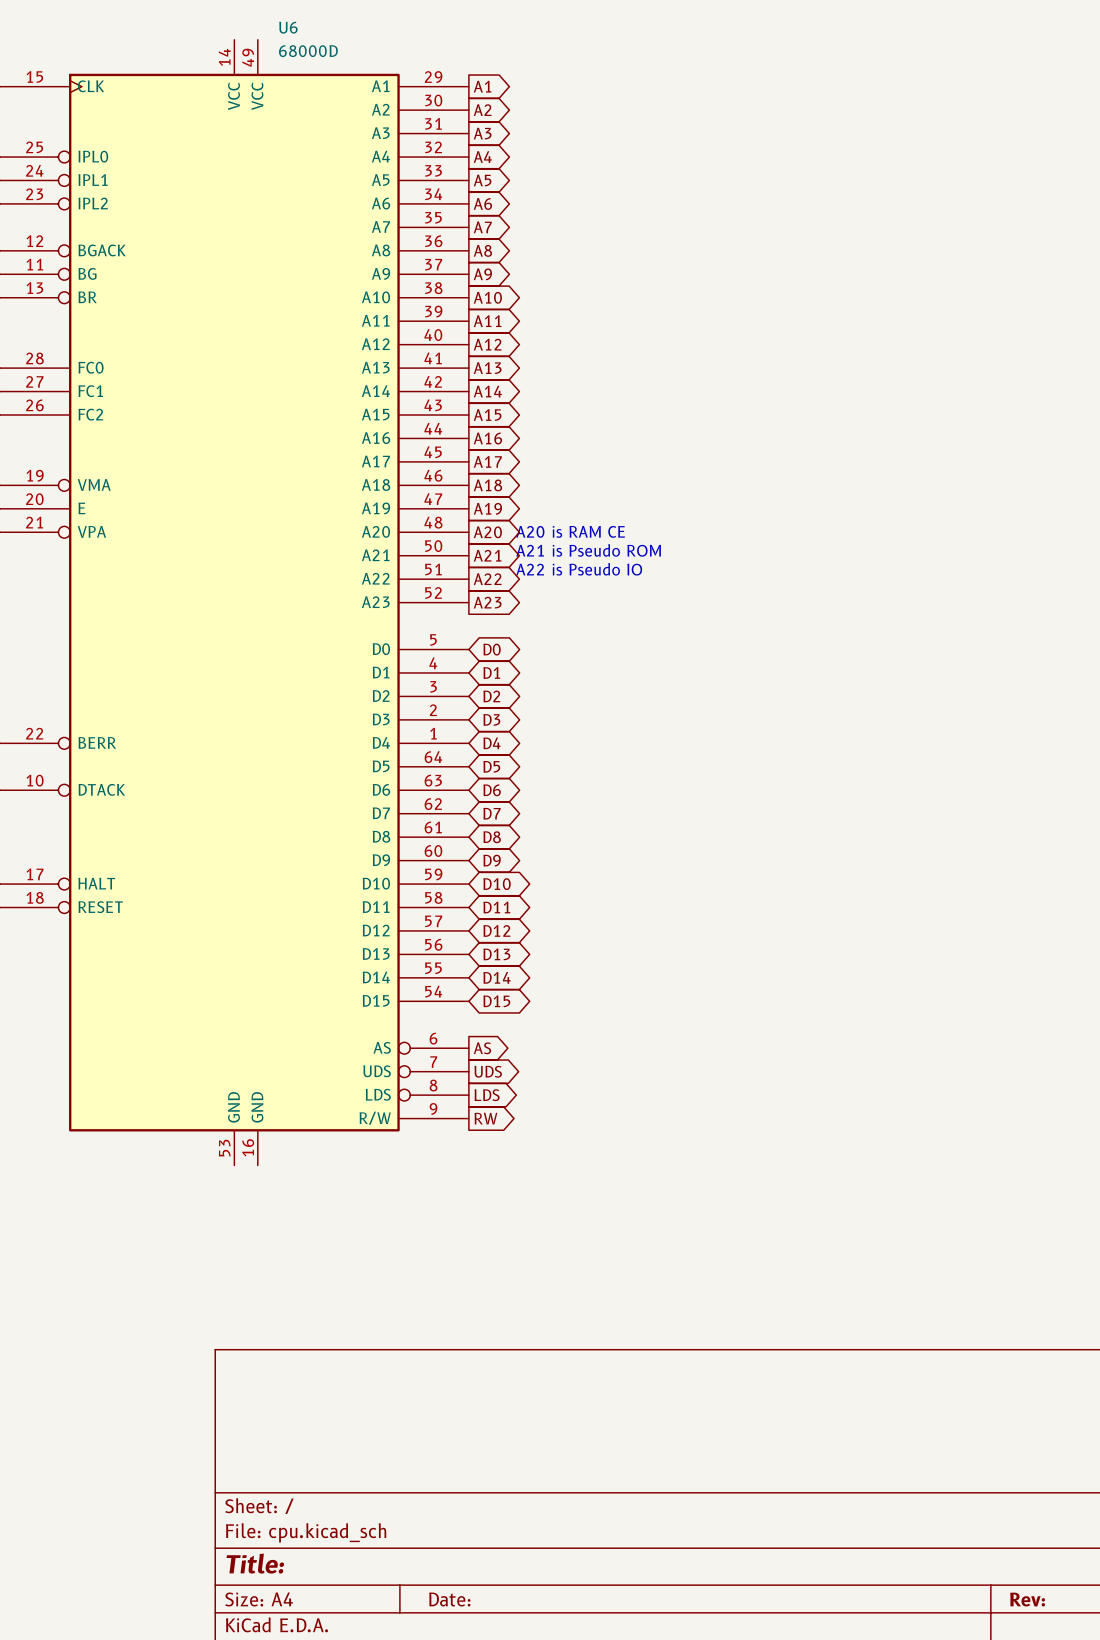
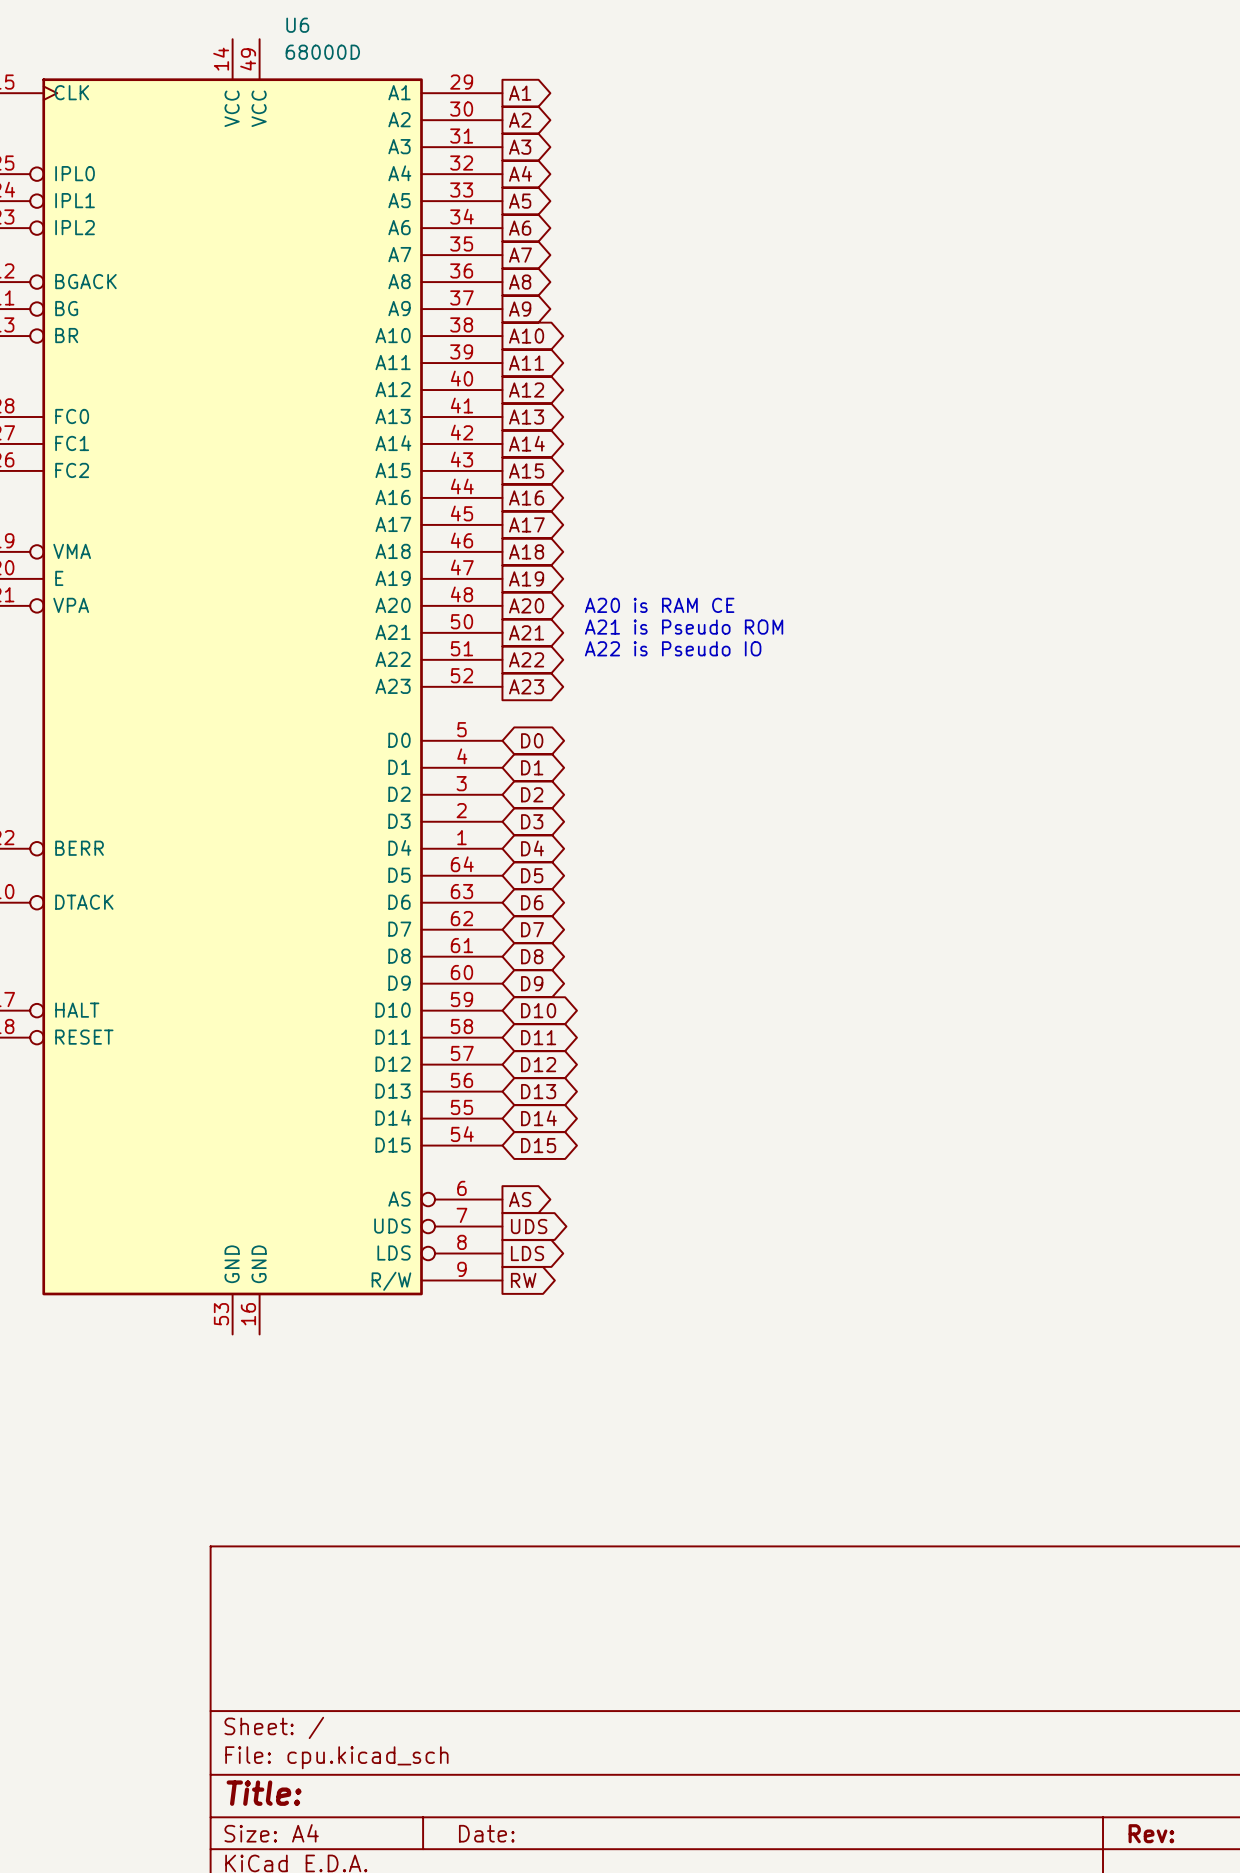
text position: A20 is RAM CE (570, 531) -> A20 is RAM CE (659, 605)
text position: A21 is Pseudo ROM (588, 550) -> A21 is Pseudo ROM (684, 627)
text position: A22 is Pseudo IO (579, 569) -> A22 is Pseudo IO (673, 648)

